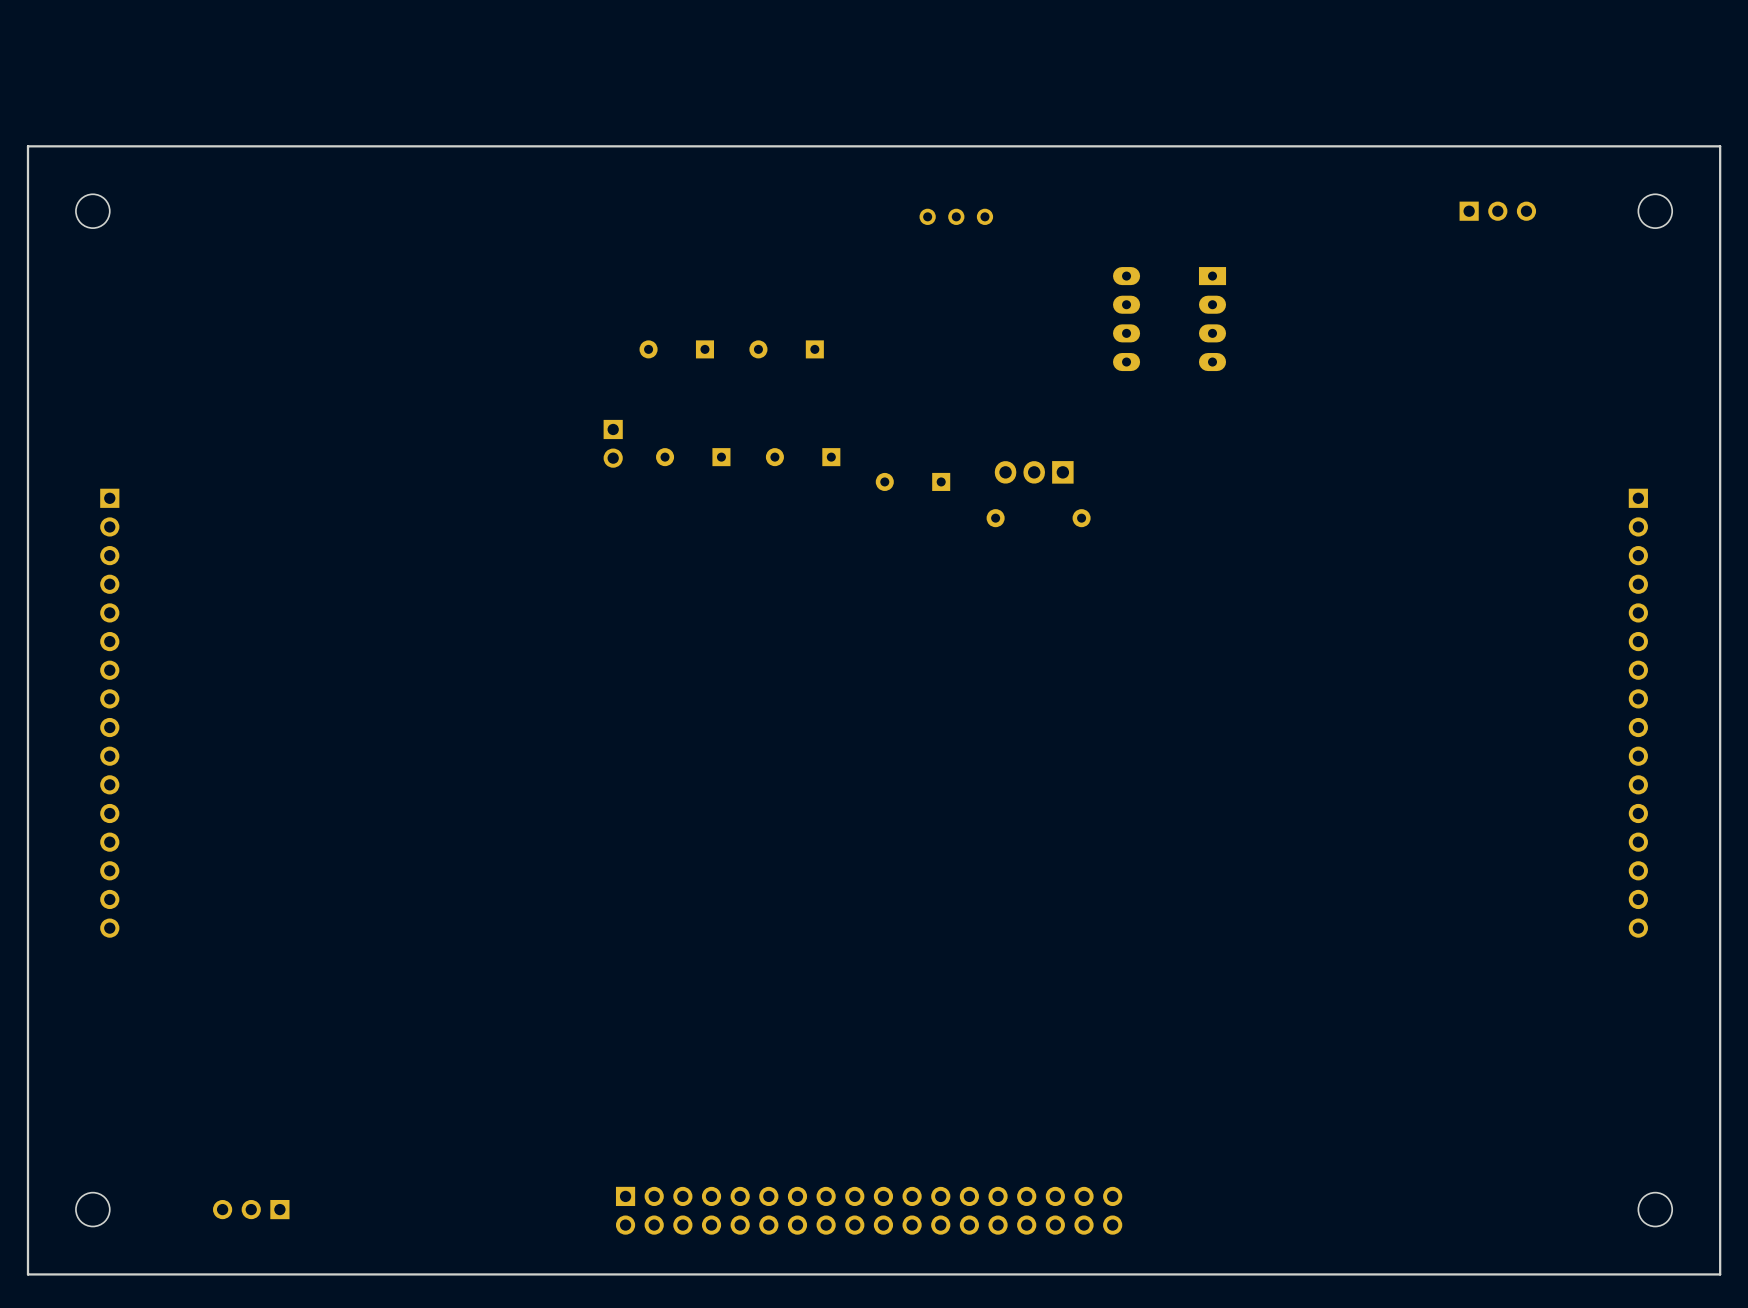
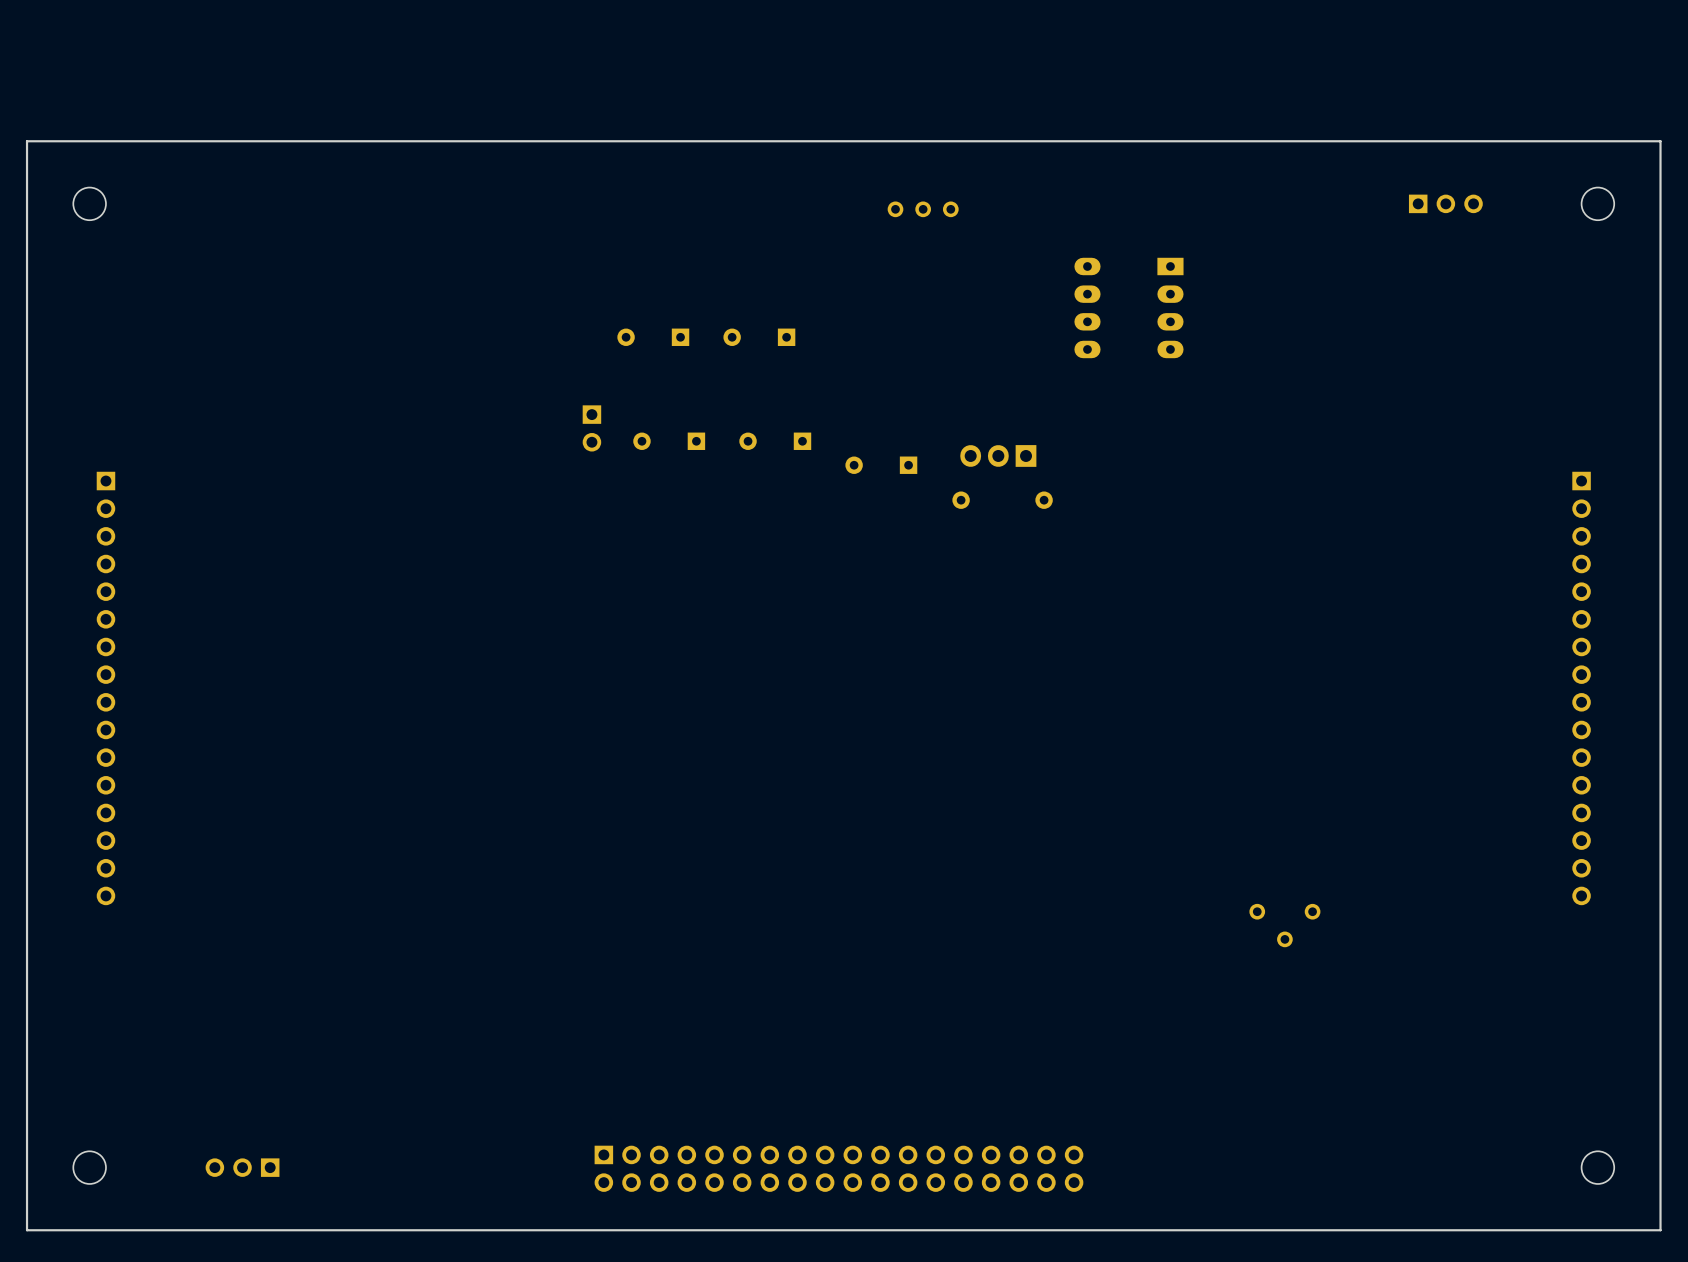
part: none -> (1284, 925)

